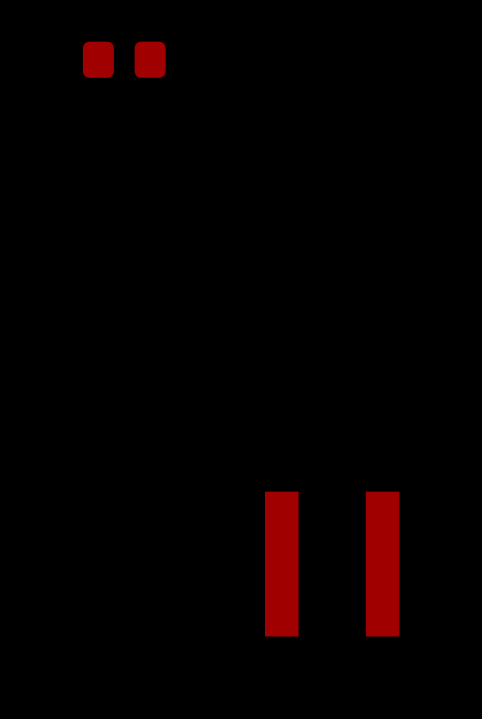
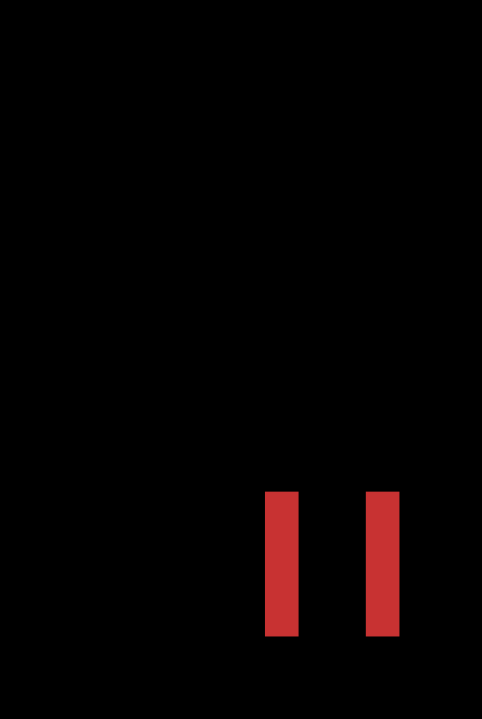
part: (124, 59) -> none

